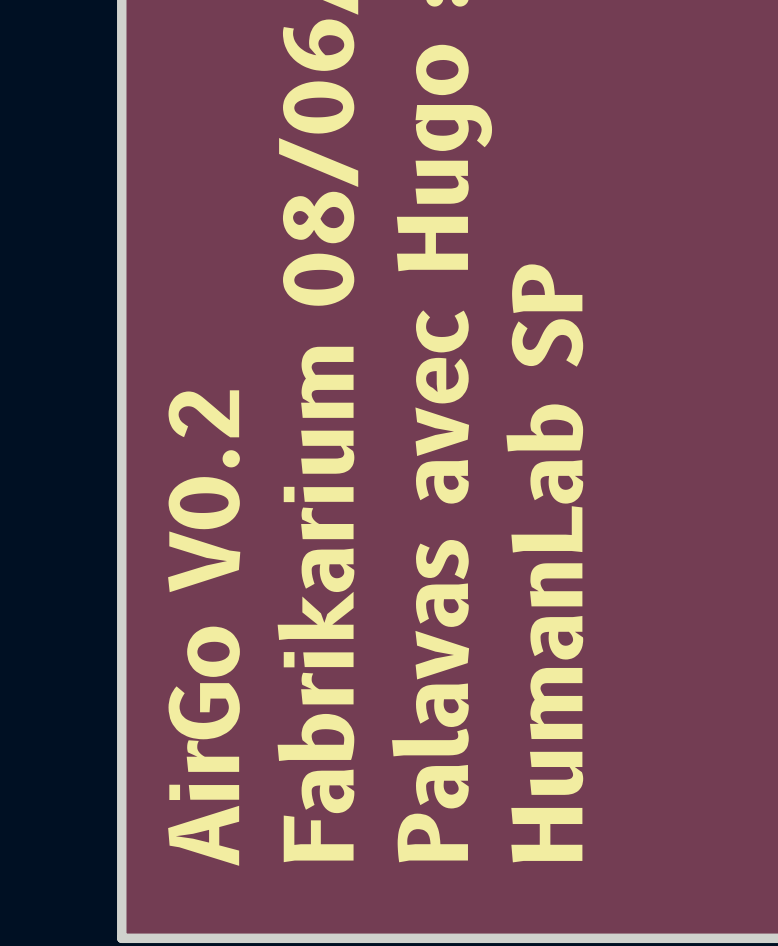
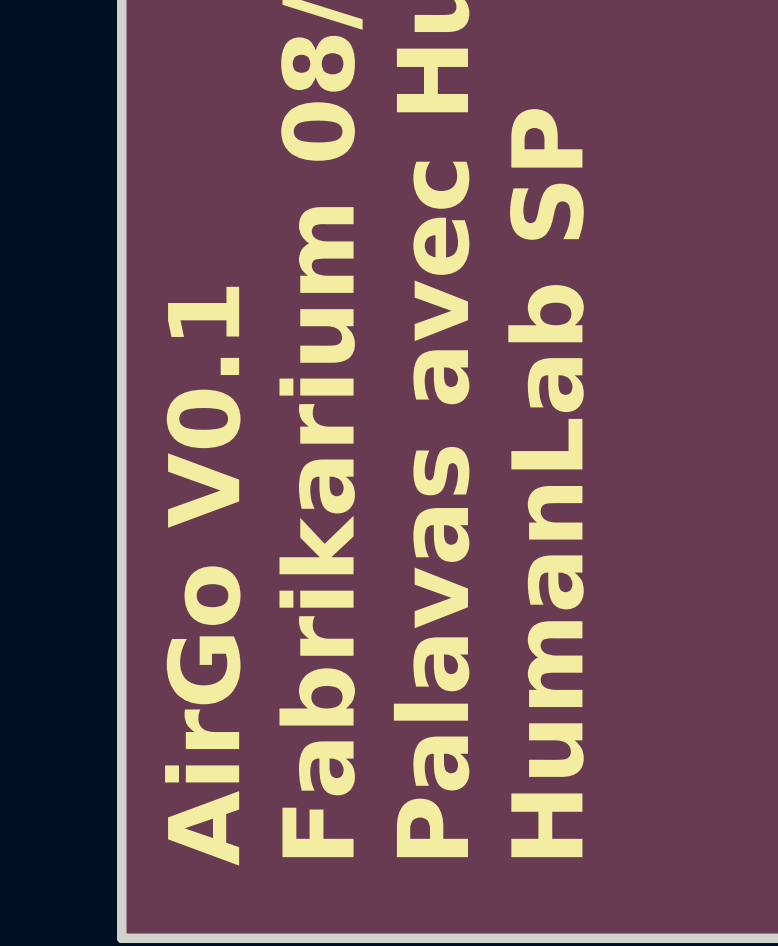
text: AirGo V0.2 (204, 628) -> AirGo V0.1 (202, 576)

